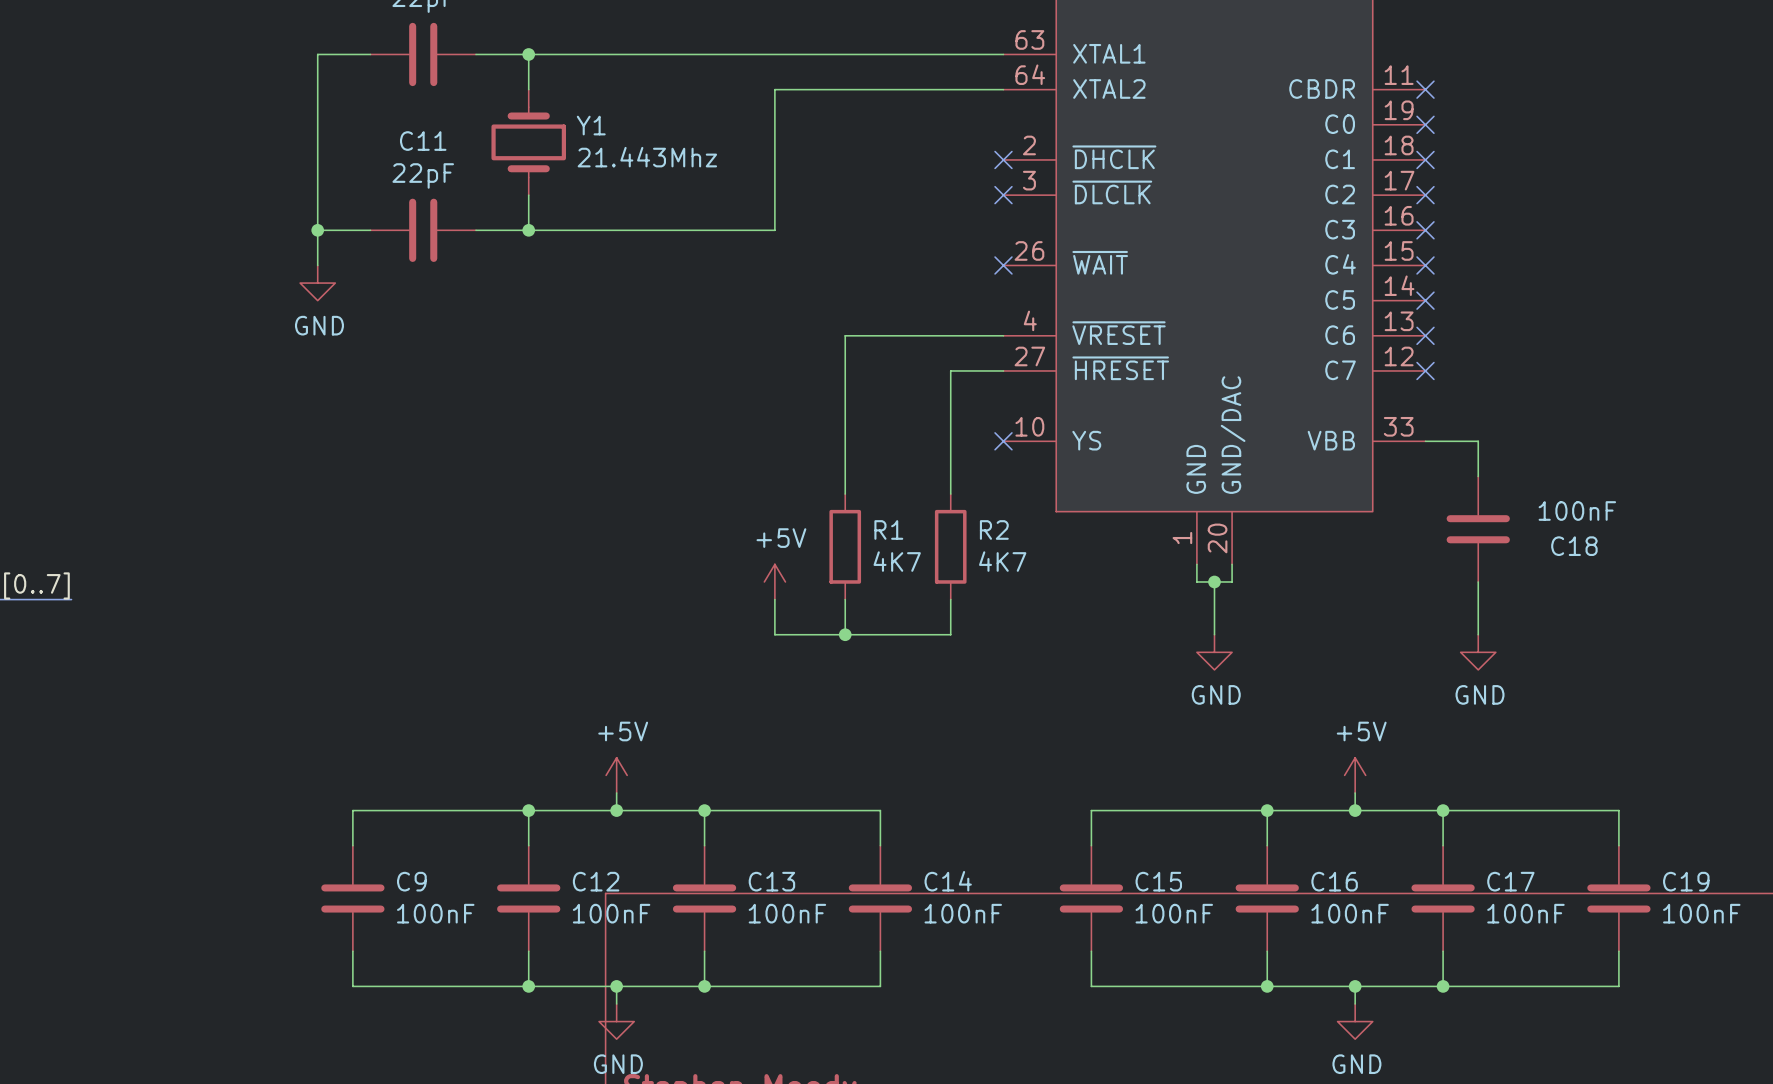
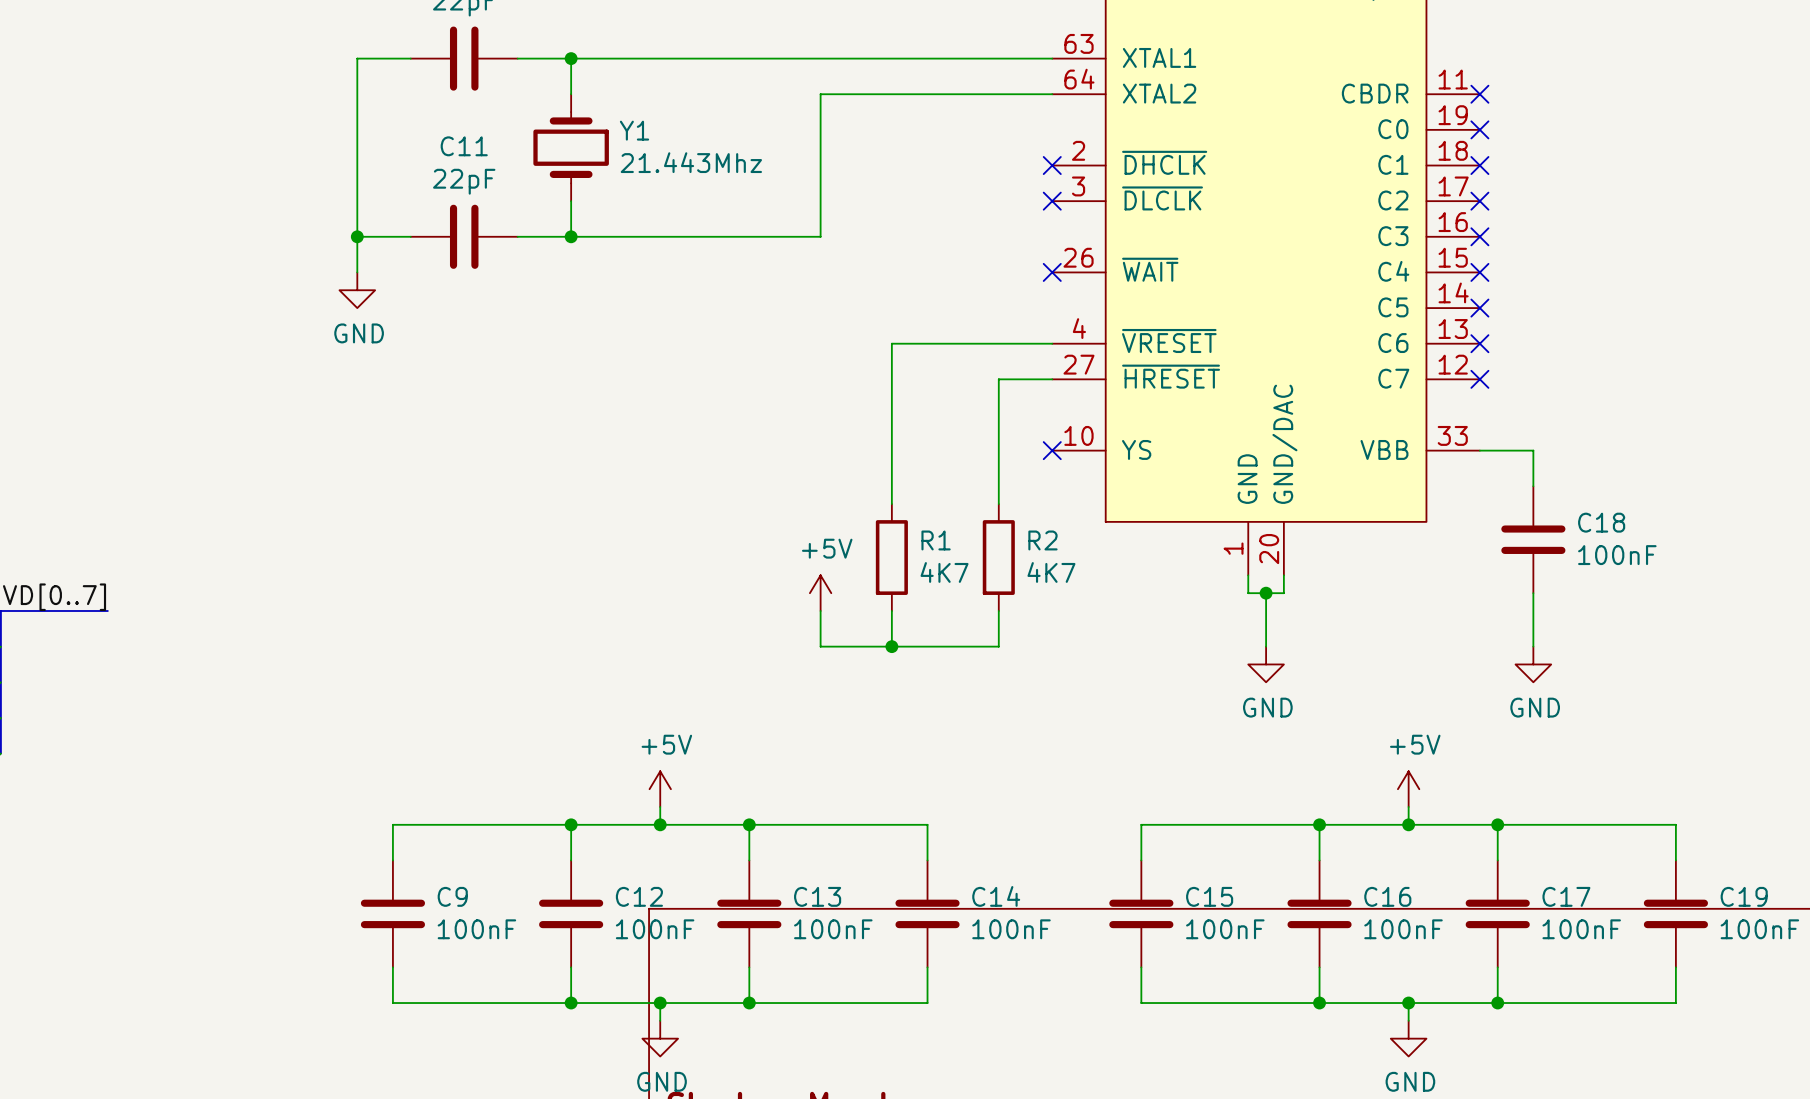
C18 value position: 100nF (1577, 510) -> 100nF (1617, 555)
C18 name position: C18 (1574, 546) -> C18 (1601, 522)

